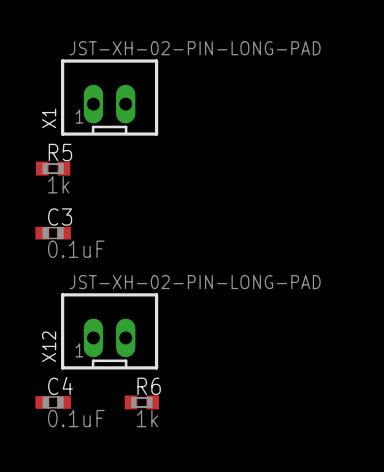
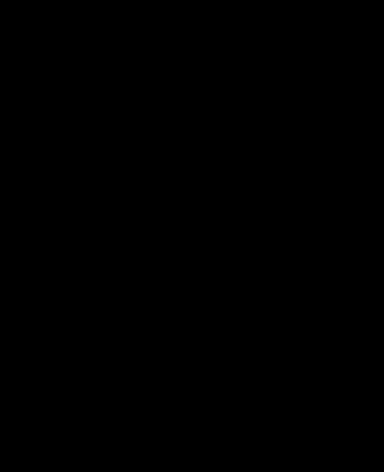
X1: JST-XH-02-PIN-LONG-PAD (109, 97) -> none
R5: 1k (53, 168) -> none
C3: 0.1uF (53, 233) -> none
X12: JST-XH-02-PIN-LONG-PAD (109, 331) -> none
C4: 0.1uF (53, 402) -> none
R6: 1k (141, 402) -> none

